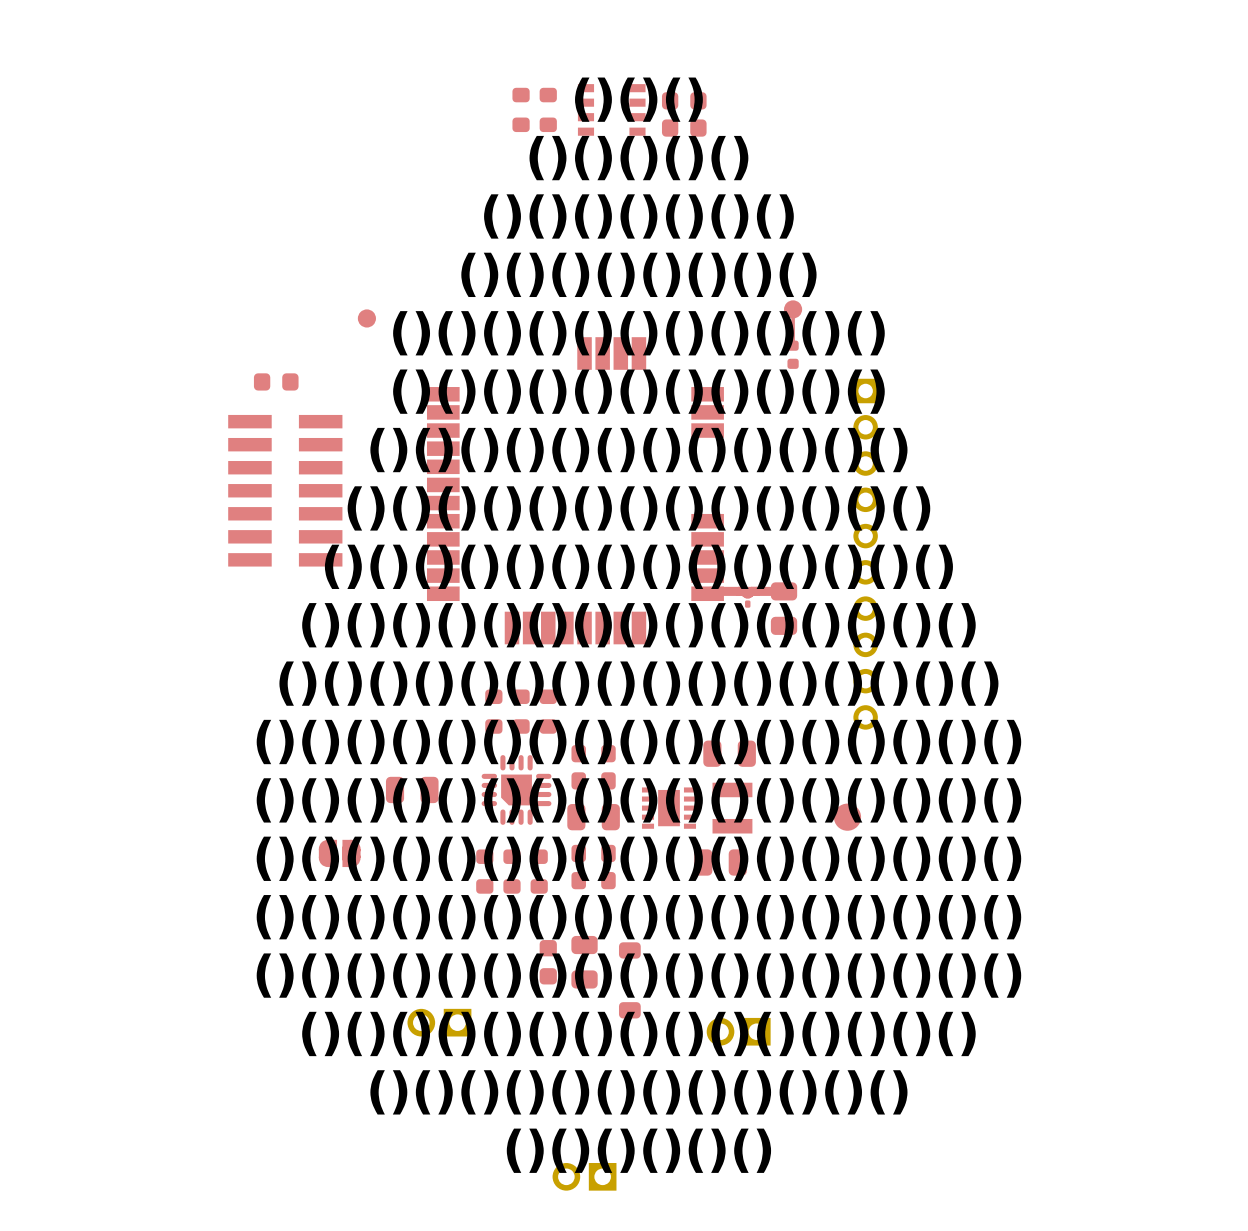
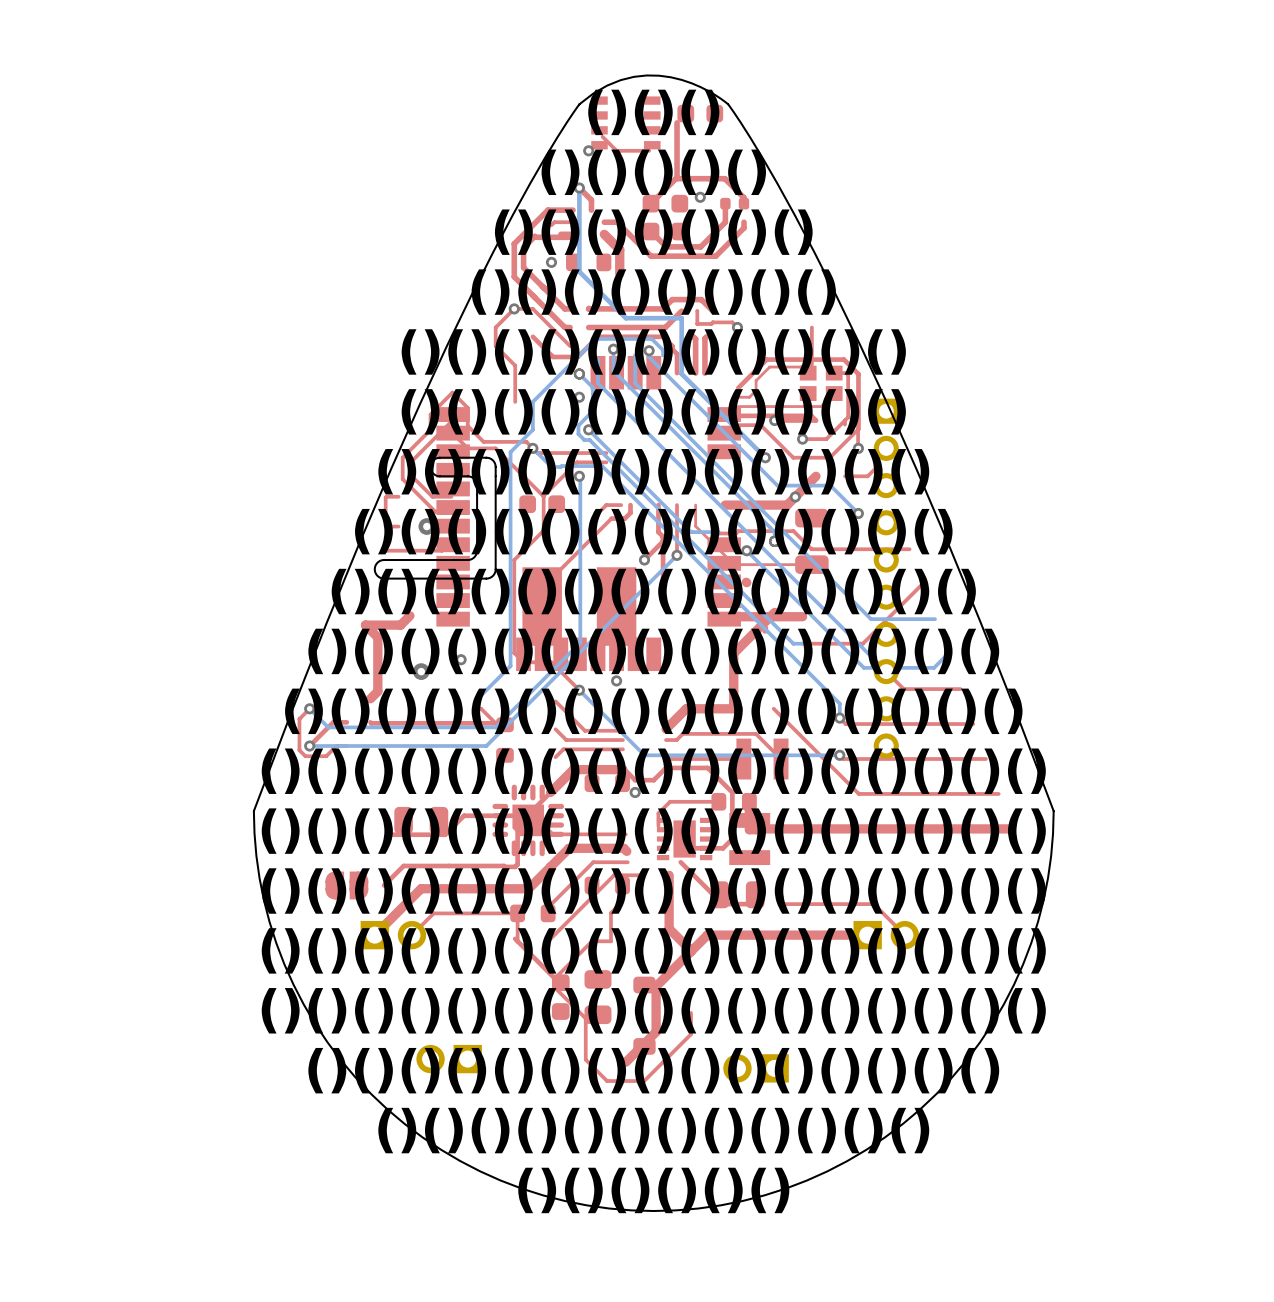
board edge: none -> (728, 104) (762, 157) (814, 251) (860, 346) (916, 469) (980, 623) (1053, 811) (1051, 855) (1043, 900) (1031, 943) (1003, 1004) (979, 1042) (951, 1077) (903, 1123) (847, 1161) (806, 1180) (764, 1195) (720, 1205) (676, 1210) (609, 1208) (564, 1200) (521, 1188) (460, 1161) (404, 1123) (355, 1077) (315, 1023) (284, 964) (263, 900) (256, 855) (253, 811) (326, 623) (420, 404) (493, 251) (530, 183) (573, 112) (579, 104) (607, 85) (620, 80) (646, 75) (670, 77) (691, 83) (708, 91) (728, 104)
part: (521, 109) -> none
part: (548, 109) -> none
top track: none -> (677, 122) (677, 177) (650, 203)
top track: none -> (602, 136) (616, 150) (649, 150)
part: (684, 128) -> none
via: none -> (588, 150)
top track: none -> (675, 178) (724, 178) (743, 197) (743, 203)
top track: none -> (579, 188) (591, 200) (591, 210)
bottom track: none -> (579, 188) (579, 271) (625, 318) (681, 318) (681, 374) (765, 457)
via: none -> (579, 188)
via: none -> (700, 197)
part: none -> (665, 203)
top track: none -> (725, 203) (725, 222) (700, 246) (666, 246) (650, 231)
part: none -> (734, 203)
top track: none -> (573, 210) (547, 210) (514, 243) (514, 276) (564, 327) (570, 327)
top track: none -> (573, 222) (554, 222) (551, 225)
top track: none -> (743, 222) (743, 227) (715, 256) (651, 256) (617, 222) (604, 222)
part: none -> (665, 231)
top track: none -> (560, 234) (573, 234) (570, 237) (534, 236) (523, 247) (523, 267) (564, 308) (570, 308)
top track: none -> (604, 234) (619, 249) (619, 273)
via: none -> (551, 262)
part: none -> (588, 262)
top track: none -> (589, 308) (663, 308) (672, 299) (701, 299) (712, 311)
via: none -> (514, 308)
top track: none -> (681, 311) (665, 327) (588, 327)
top track: none -> (697, 311) (697, 323) (732, 322) (737, 327)
via: none -> (737, 327)
part: (793, 309) -> none
part: (366, 318) -> none
top track: none -> (532, 336) (553, 356) (577, 356) (597, 336) (663, 336) (677, 353) (677, 373)
top track: none -> (693, 336) (695, 339) (695, 373)
top track: none -> (706, 336) (704, 338) (704, 373)
top track: none -> (570, 346) (532, 308) (514, 308) (495, 327) (495, 346) (515, 365) (515, 401)
bottom track: none -> (613, 349) (613, 370) (774, 532) (774, 541)
via: none -> (613, 349)
bottom track: none -> (649, 350) (649, 357) (777, 485) (830, 485) (858, 513)
via: none -> (649, 350)
bottom track: none -> (635, 355) (635, 383) (871, 619) (935, 619)
bottom track: none -> (663, 355) (663, 350) (651, 338) (595, 338) (532, 401) (532, 429) (510, 452) (510, 666) (477, 699) (477, 708)
bottom track: none -> (597, 359) (597, 383) (872, 657)
part footprint: [787, 340, 799, 369] -> [799, 365, 843, 401]
top track: none -> (802, 373) (808, 373) (802, 367) (769, 367) (756, 380) (756, 390) (749, 397) (738, 397)
top track: none -> (834, 373) (846, 373) (848, 374) (848, 417) (826, 439) (802, 439)
bottom track: none -> (579, 374) (592, 387) (592, 411) (578, 425) (578, 434) (584, 440) (589, 440) (793, 643) (802, 643)
via: none -> (579, 374)
top track: none -> (738, 387) (766, 359) (843, 359) (858, 374) (858, 429) (829, 457) (793, 457) (760, 425) (738, 425)
top track: none -> (834, 393) (821, 406) (738, 406)
via: none -> (579, 397)
part: (276, 381) -> none
top track: none -> (738, 415) (811, 415) (815, 420) (774, 420)
via: none -> (774, 420)
top track: none -> (844, 420) (844, 424)
top track: none -> (858, 429) (858, 448)
bottom track: none -> (588, 429) (690, 532) (718, 532)
via: none -> (588, 429)
via: none -> (802, 439)
bottom track: none -> (532, 448) (551, 467) (602, 466) (839, 703) (839, 718)
via: none -> (532, 448)
via: none -> (858, 448)
top track: none -> (606, 453) (537, 453) (526, 441) (483, 441) (467, 426) (467, 407) (452, 392) (430, 414) (430, 429) (402, 457) (402, 479) (435, 511) (451, 511)
board edge: none -> (486, 457) (438, 457) (433, 460) (430, 465) (431, 471) (436, 475) (468, 476) (476, 482) (477, 550) (474, 557) (467, 560) (382, 560) (375, 565) (375, 571) (377, 575) (384, 578) (486, 578) (492, 575) (495, 569) (495, 467) (492, 460) (486, 457)
via: none -> (765, 457)
top track: none -> (606, 462) (577, 462) (543, 495) (543, 530) (514, 560) (514, 653) (523, 662) (551, 662) (579, 690)
top track: none -> (876, 467) (867, 476) (844, 476)
bottom track: none -> (579, 476) (580, 642) (495, 727) (328, 727) (309, 708)
via: none -> (579, 476)
top track: none -> (815, 476) (787, 505) (725, 505)
top track: none -> (398, 496) (385, 497) (385, 525) (398, 526)
top track: none -> (543, 496) (495, 448) (467, 448) (452, 433) (452, 420) (411, 461) (411, 476) (432, 496) (451, 496)
via: none -> (795, 496)
part: none -> (542, 504)
top track: none -> (621, 505) (606, 505) (597, 513)
top track: none -> (630, 505) (630, 512) (624, 518) (611, 518) (542, 587) (542, 606)
top track: none -> (658, 505) (658, 532) (663, 536) (663, 582)
top track: none -> (677, 505) (677, 555)
top track: none -> (695, 505) (695, 526) (734, 564) (811, 564)
part: (285, 490) -> none
via: none -> (858, 513)
via: none -> (426, 526)
top track: none -> (719, 533) (736, 533) (738, 531) (793, 531) (811, 549) (909, 549)
top track: none -> (451, 541) (442, 550) (385, 550)
top track: none -> (663, 541) (644, 560)
via: none -> (774, 541)
part: none -> (811, 541)
bottom track: none -> (746, 550) (863, 667) (934, 667) (947, 654)
via: none -> (746, 550)
bottom track: none -> (677, 555) (486, 746) (309, 746)
via: none -> (677, 555)
via: none -> (644, 560)
top track: none -> (746, 582) (746, 582)
top track: none -> (922, 584) (862, 643) (802, 643)
part: none -> (579, 606)
top track: none -> (774, 612) (733, 653) (733, 704) (738, 708) (686, 708) (666, 729)
top track: none -> (409, 615) (400, 625) (365, 625) (377, 637) (377, 691) (370, 698)
part: (784, 608) -> none
top track: none -> (872, 657) (903, 689) (960, 689)
via: none -> (461, 659)
via: none -> (421, 671)
via: none -> (616, 680)
bottom track: none -> (579, 690) (644, 755) (839, 755)
via: none -> (579, 690)
top track: none -> (555, 701) (584, 730) (622, 730)
top track: none -> (309, 708) (299, 719) (299, 750) (305, 756) (326, 756) (336, 746) (346, 746)
via: none -> (309, 708)
top track: none -> (477, 708) (481, 708) (495, 723) (370, 722)
top track: none -> (773, 708) (858, 793) (998, 793)
top track: none -> (839, 718) (845, 724) (973, 724)
via: none -> (839, 718)
top track: none -> (346, 722) (333, 722) (309, 746)
top track: none -> (555, 729) (566, 740) (622, 740)
part: (521, 711) -> none
part: (548, 711) -> none
top track: none -> (666, 740) (676, 740) (682, 733) (755, 733) (781, 759)
via: none -> (309, 746)
top track: none -> (622, 749) (563, 749) (555, 757)
top track: none -> (839, 755) (843, 758) (985, 758)
via: none -> (839, 755)
top track: none -> (666, 758) (743, 759)
part: none -> (762, 759)
top track: none -> (622, 767) (635, 780) (653, 780) (666, 767) (707, 767) (732, 792) (732, 838) (723, 848) (680, 848)
top track: none -> (622, 769) (573, 769) (527, 815) (464, 815) (445, 834) (391, 834)
part: (729, 753) -> none
via: none -> (635, 792)
top track: none -> (718, 801) (670, 801) (658, 813) (658, 825)
part: none -> (734, 801)
top track: none -> (749, 801) (749, 829) (1011, 828)
part: (593, 780) -> none
top track: none -> (515, 827) (517, 829) (517, 864) (515, 866) (403, 865) (384, 885)
top track: none -> (548, 829) (552, 834) (625, 834)
part: (593, 817) -> none
part: (847, 817) -> none
top track: none -> (626, 851) (623, 848) (569, 848) (528, 888) (421, 888) (374, 935)
top track: none -> (627, 862) (593, 862) (548, 907) (548, 913)
top track: none -> (680, 862) (722, 904) (750, 904)
top track: none -> (639, 875) (614, 875) (548, 941)
top track: none -> (669, 875) (669, 928) (690, 951)
part: (484, 871) -> none
part: (511, 871) -> none
part: (539, 871) -> none
top track: none -> (619, 904) (611, 913) (611, 941) (592, 941) (554, 978)
top track: none -> (780, 904) (873, 904) (904, 935)
part: none -> (532, 913)
part: (593, 880) -> none
part: none -> (393, 935)
top track: none -> (411, 935) (433, 913) (517, 913) (517, 941)
top track: none -> (867, 935) (707, 935) (656, 986) (656, 1031) (625, 1062)
part: none -> (886, 935)
top track: none -> (515, 938) (554, 978)
top track: none -> (554, 978) (554, 987) (585, 1018) (585, 1059) (607, 1081) (644, 1081) (690, 1034) (690, 1012)
part: (584, 1176) -> none

